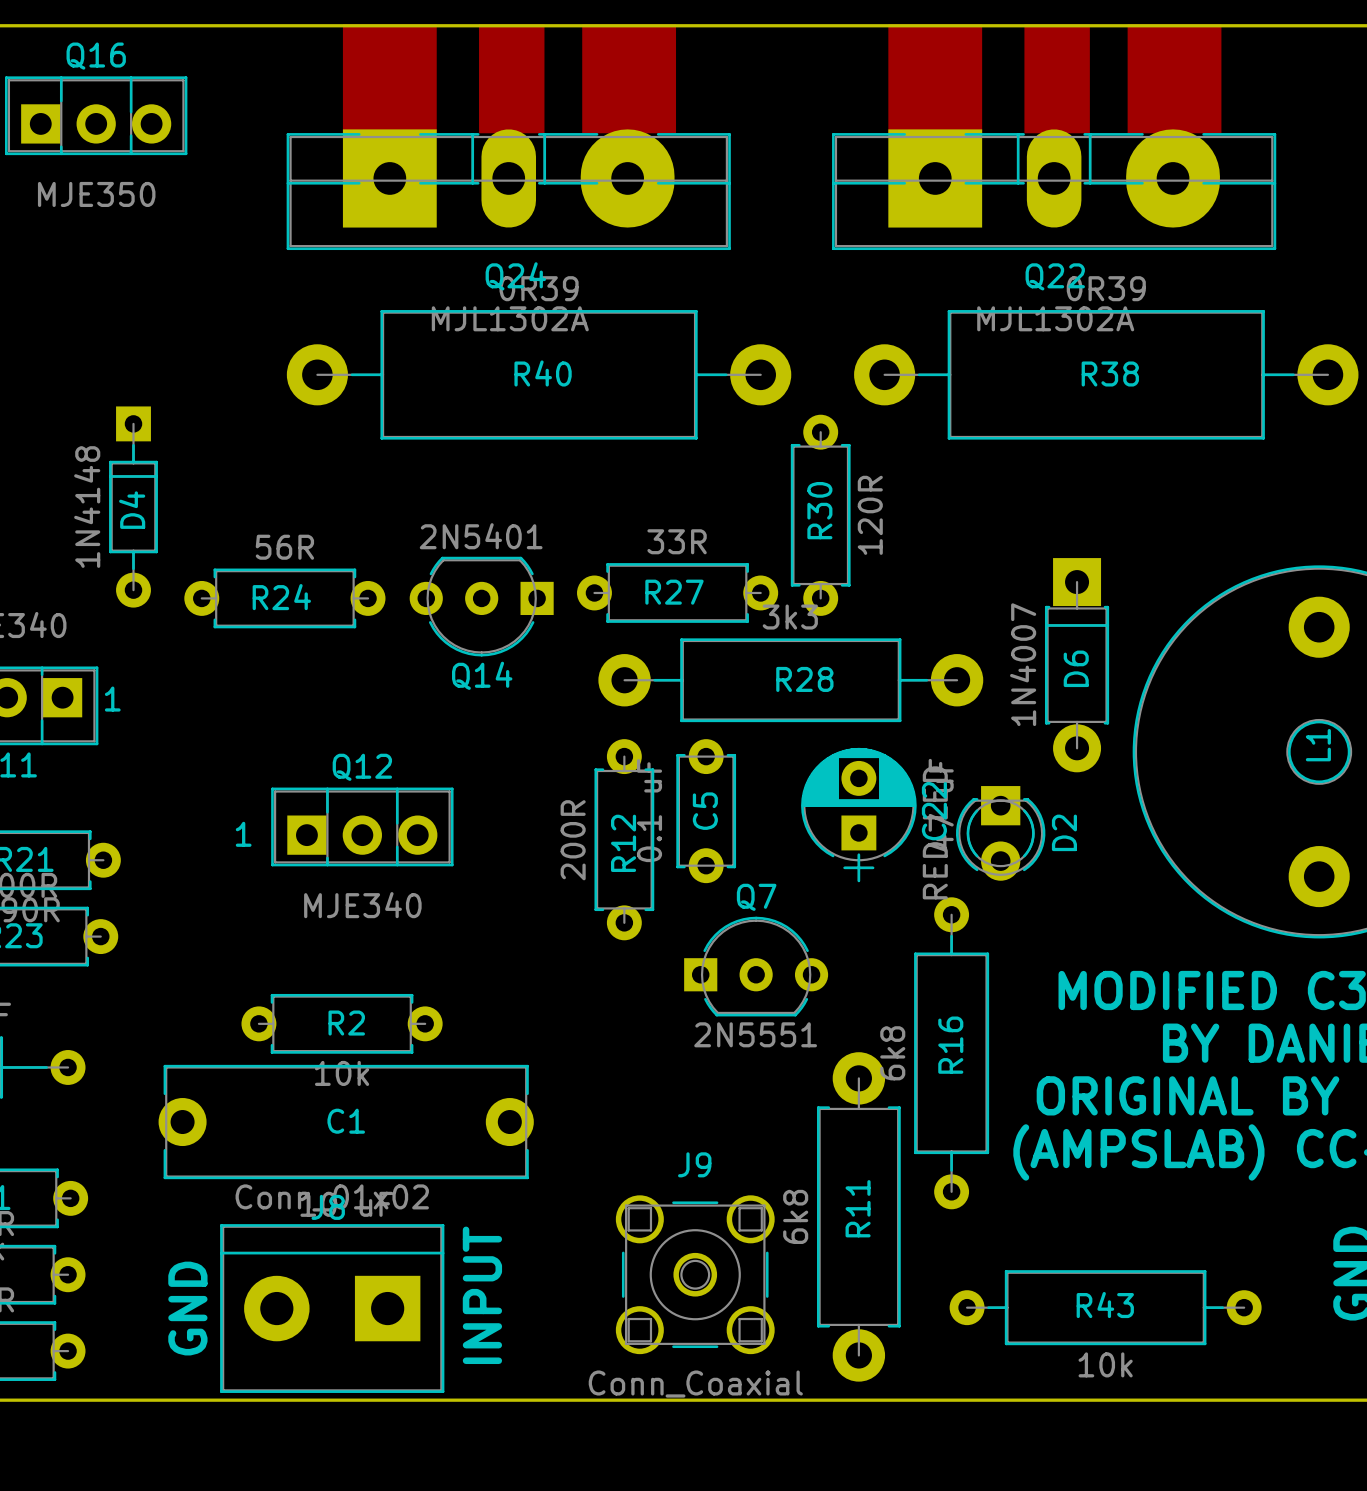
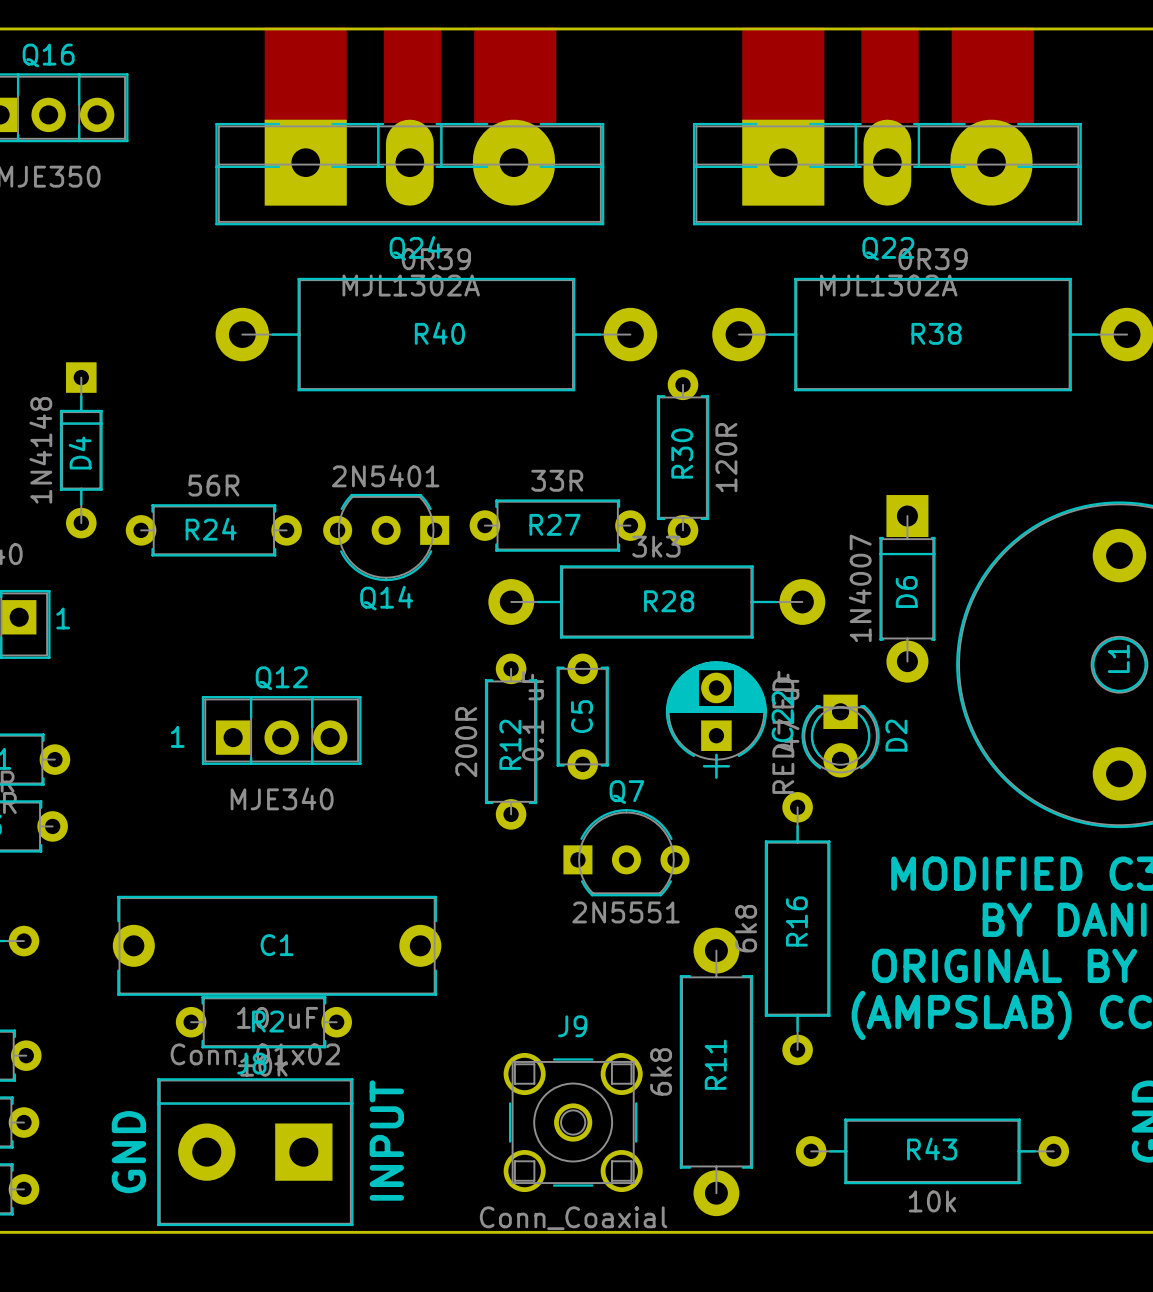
R2 position: (342, 1023) -> (263, 1022)
C1 position: (346, 1122) -> (277, 945)

